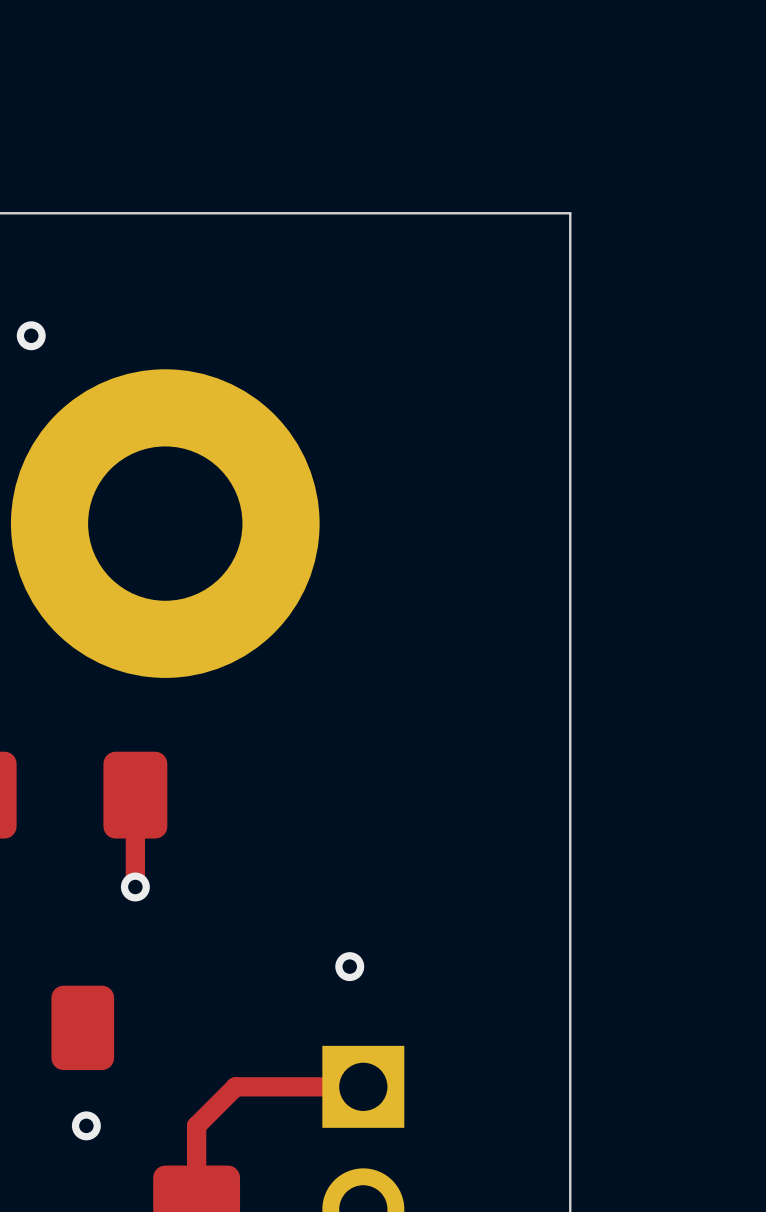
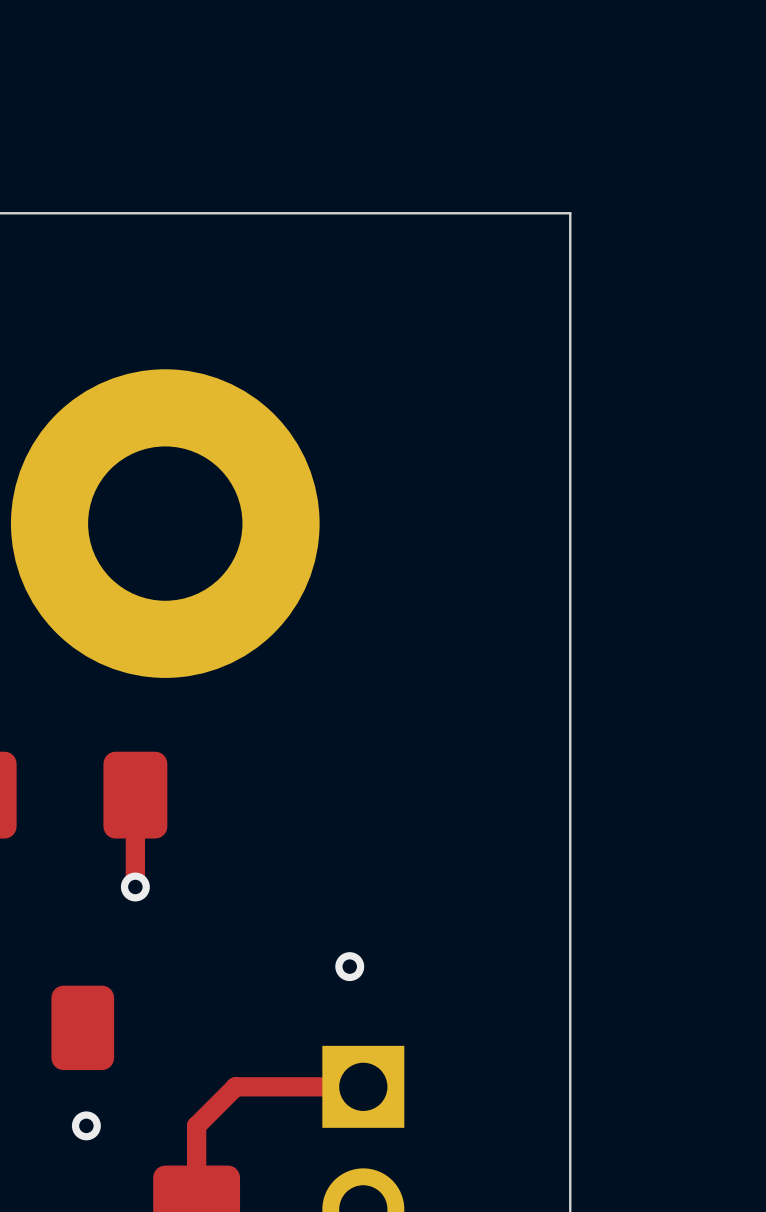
via: (31, 335) -> none

